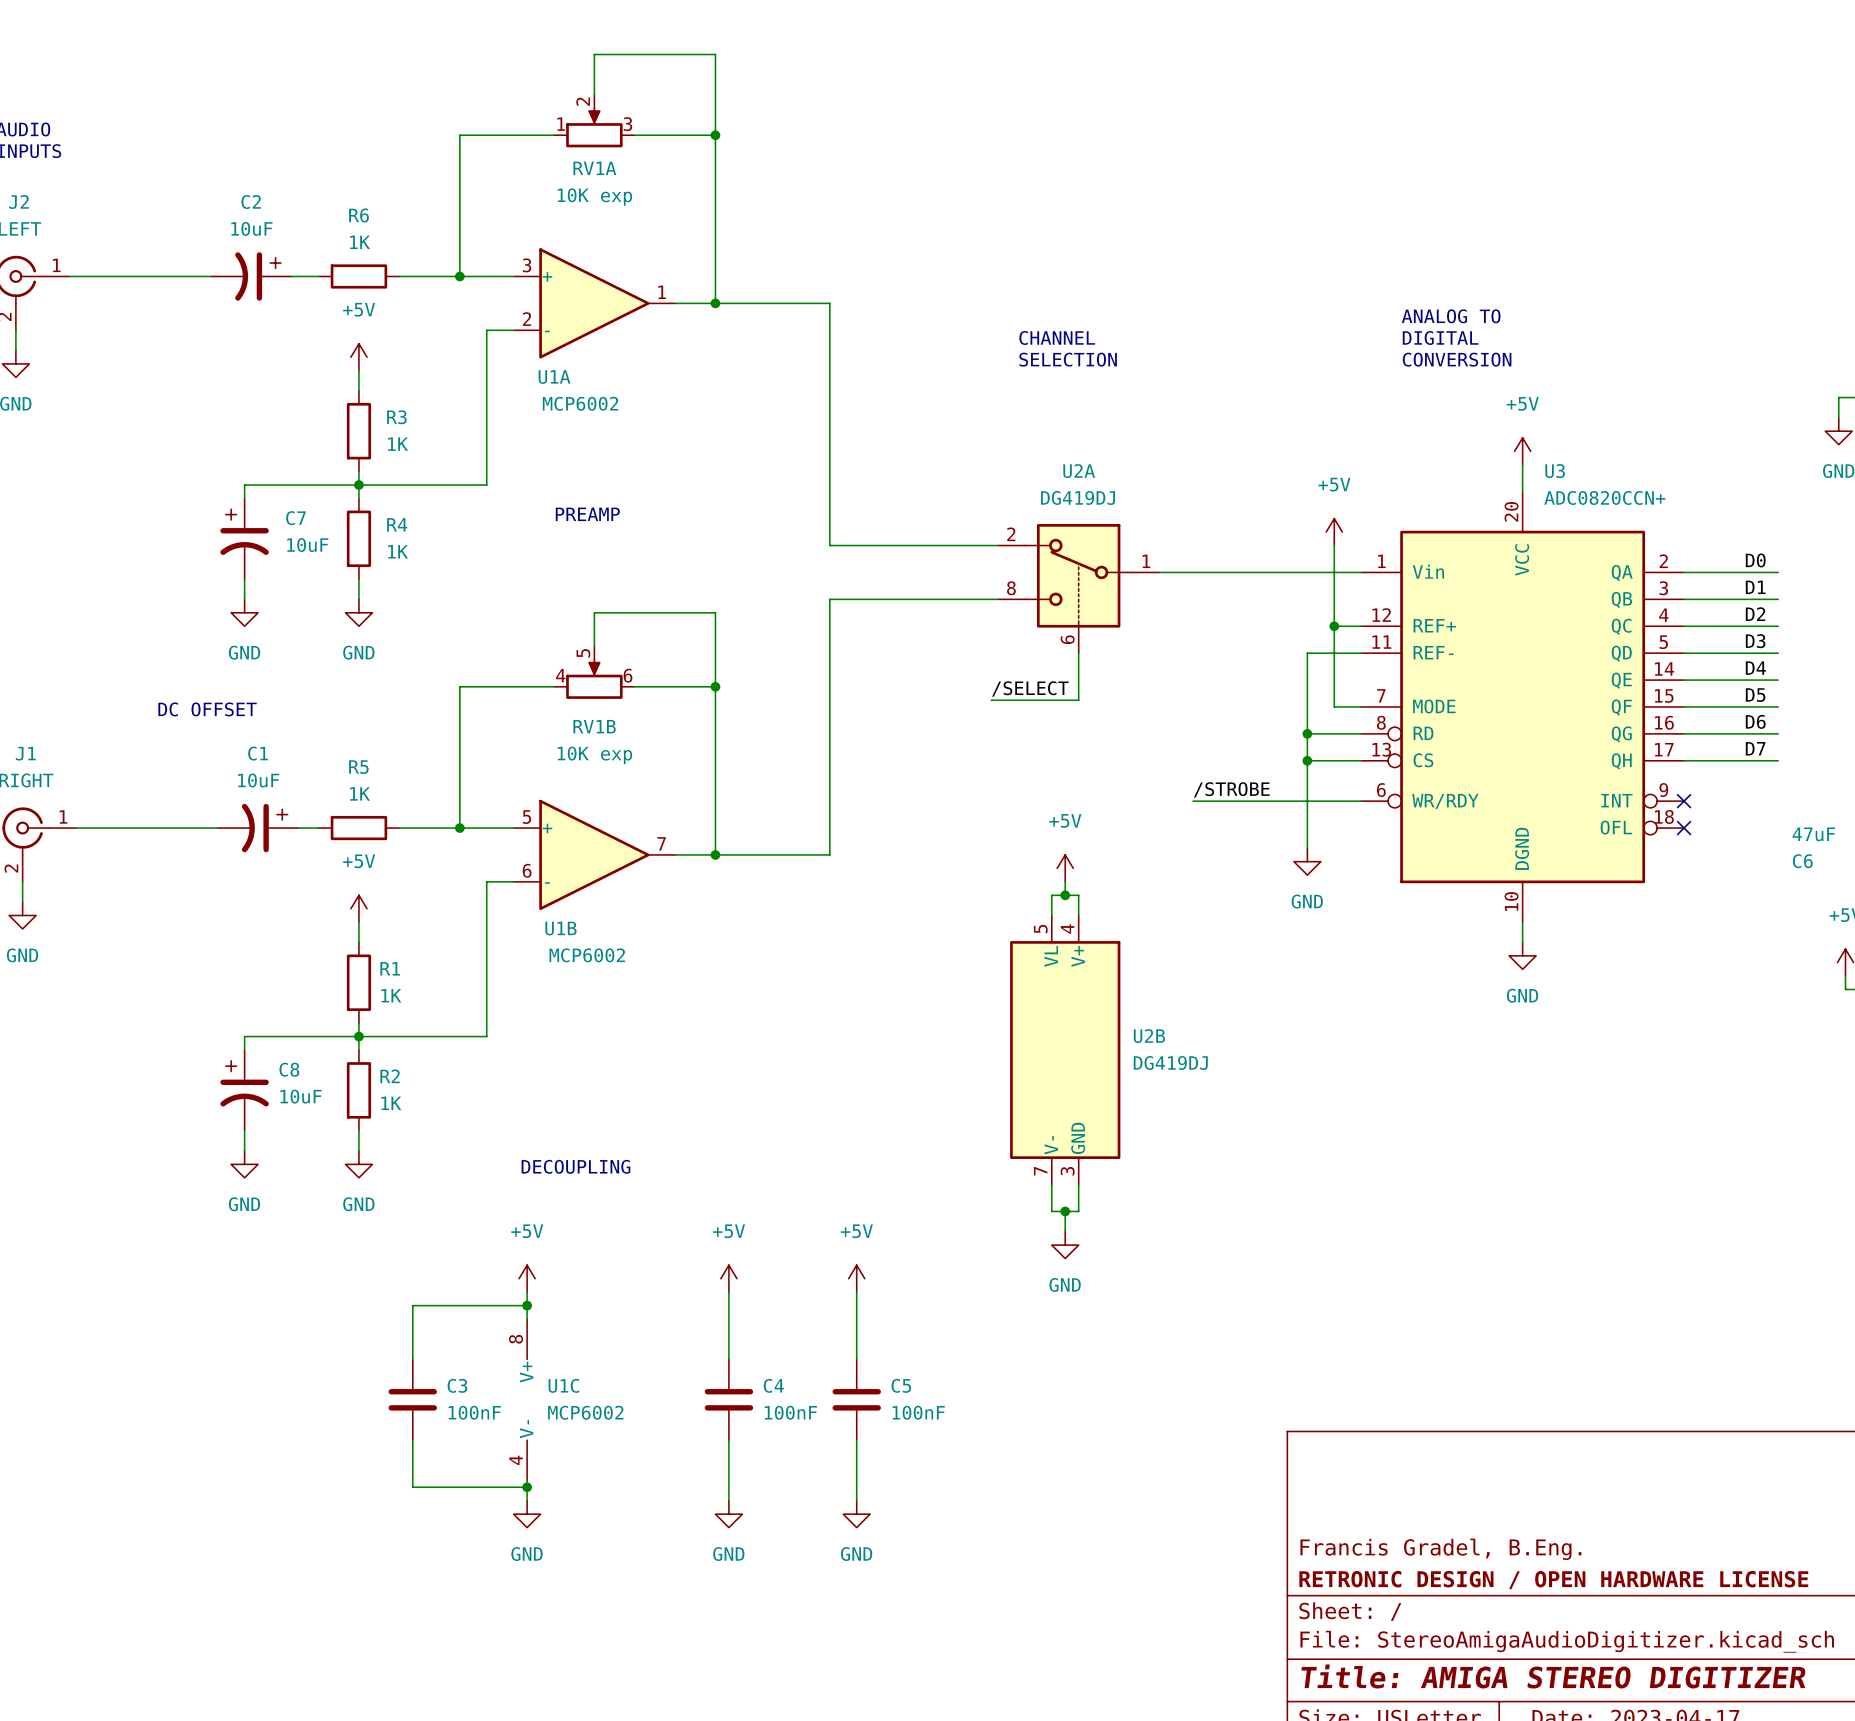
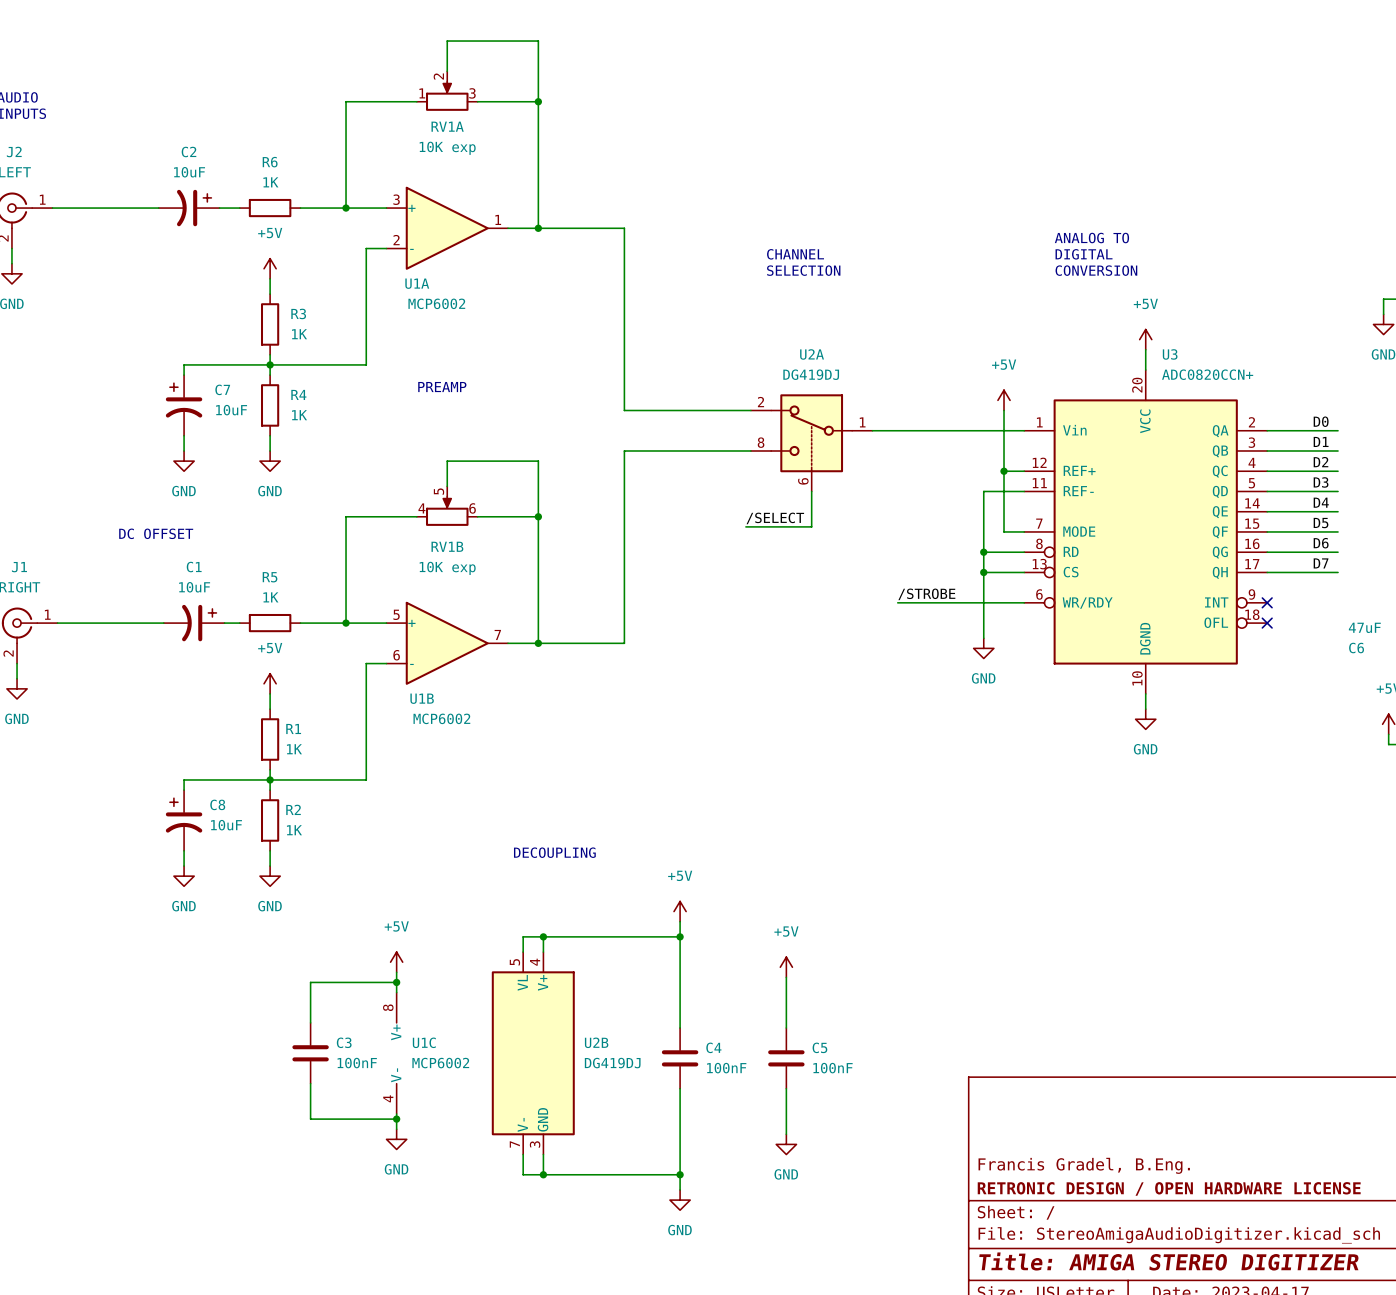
power symbol: +5V (1065, 868) -> none
wire: (1065, 881) (1065, 895) -> none
junction: (1065, 895) -> none
wire: (1051, 915) (1051, 895) (1078, 895) (1078, 915) -> none
U2B position: (1065, 1050) -> (533, 1053)
text position: DECOUPLING (575, 1166) -> DECOUPLING (554, 852)
wire: (1051, 1184) (1051, 1211) (1078, 1211) (1078, 1184) -> none
wire: (1065, 1211) (1065, 1231) -> none
junction: (1065, 1211) -> none
wire: none -> (680, 921) (680, 1027)
wire: none -> (543, 936) (543, 952)
junction: none -> (543, 936)
wire: none -> (680, 936) (523, 936) (523, 952)
junction: none -> (680, 936)
power symbol: GND (1065, 1245) -> none
power symbol: +5V (728, 1278) -> none
power symbol position: +5V (856, 1278) -> +5V (680, 911)
power symbol: none -> +5V (786, 967)
wire: (856, 1292) (856, 1359) -> (786, 977) (786, 1027)
C4 position: (728, 1399) -> (680, 1058)
C5 position: (856, 1399) -> (786, 1058)
wire: (856, 1440) (856, 1500) -> (786, 1088) (786, 1134)
wire: none -> (680, 1088) (680, 1189)
power symbol: GND (728, 1514) -> none
power symbol position: GND (856, 1514) -> GND (680, 1200)
power symbol: none -> GND (786, 1144)
wire: none -> (523, 1154) (523, 1174) (680, 1174)
wire: none -> (543, 1154) (543, 1174)
junction: none -> (543, 1174)
junction: none -> (680, 1174)

